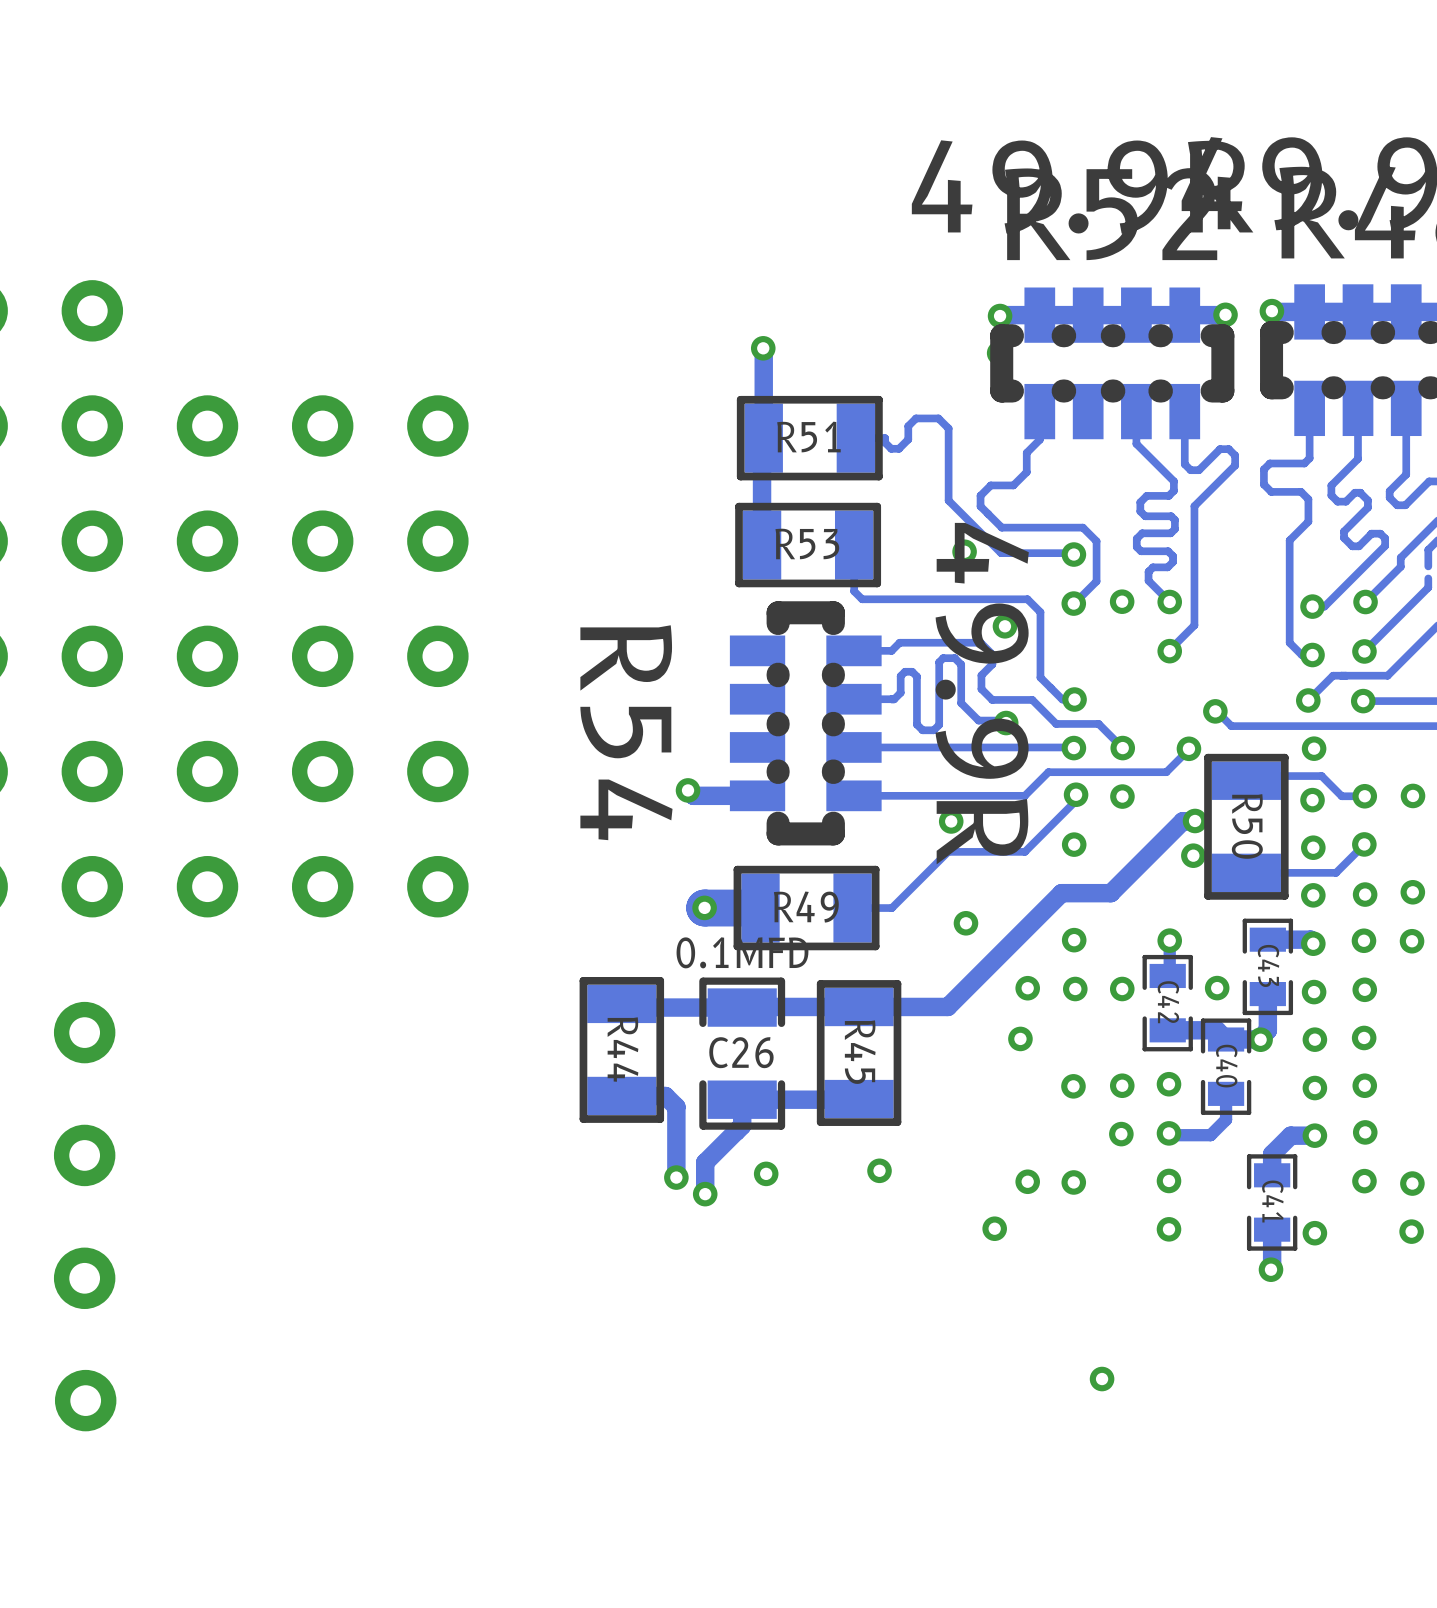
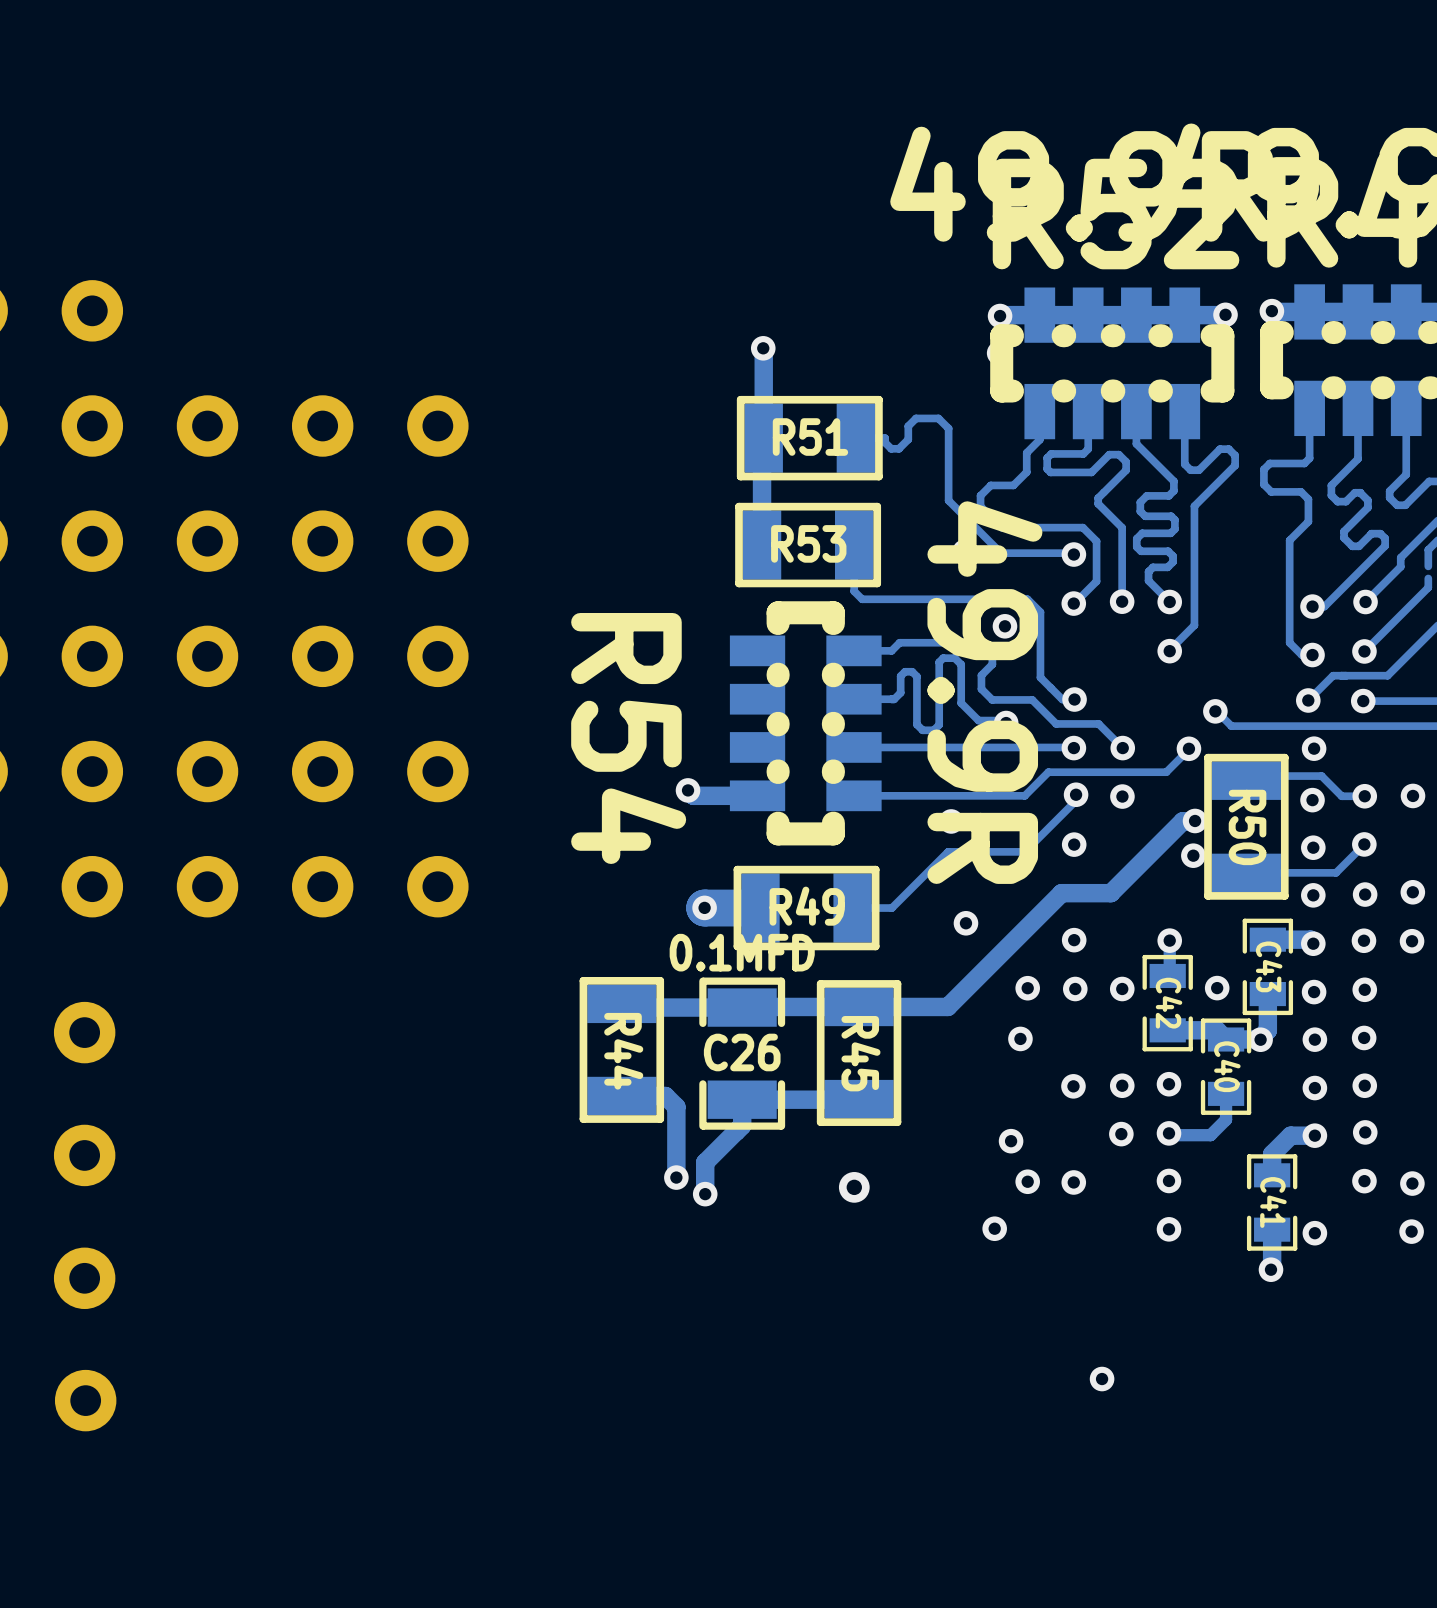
track: none -> (1088, 411) (1088, 449) (1083, 453) (1051, 453) (1047, 458) (1047, 468) (1050, 472) (1091, 472) (1109, 454) (1118, 454) (1126, 461) (1126, 470) (1104, 492)
track: none -> (1103, 492) (1098, 498) (1098, 503) (1122, 527) (1122, 601)
via: none -> (1011, 1141)
via position: (879, 1170) -> (854, 1187)
via: (766, 1173) -> none

